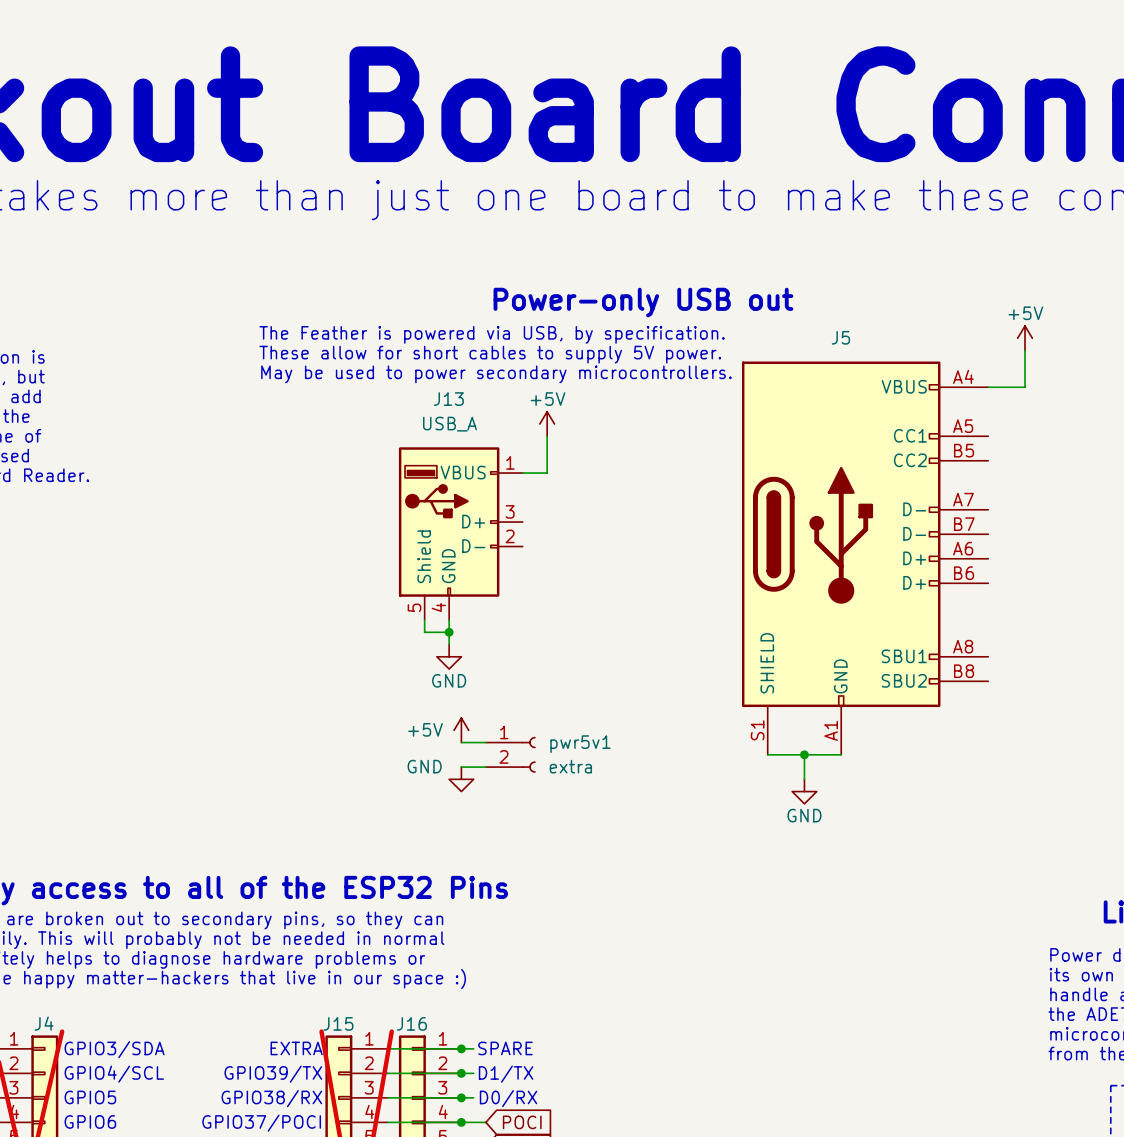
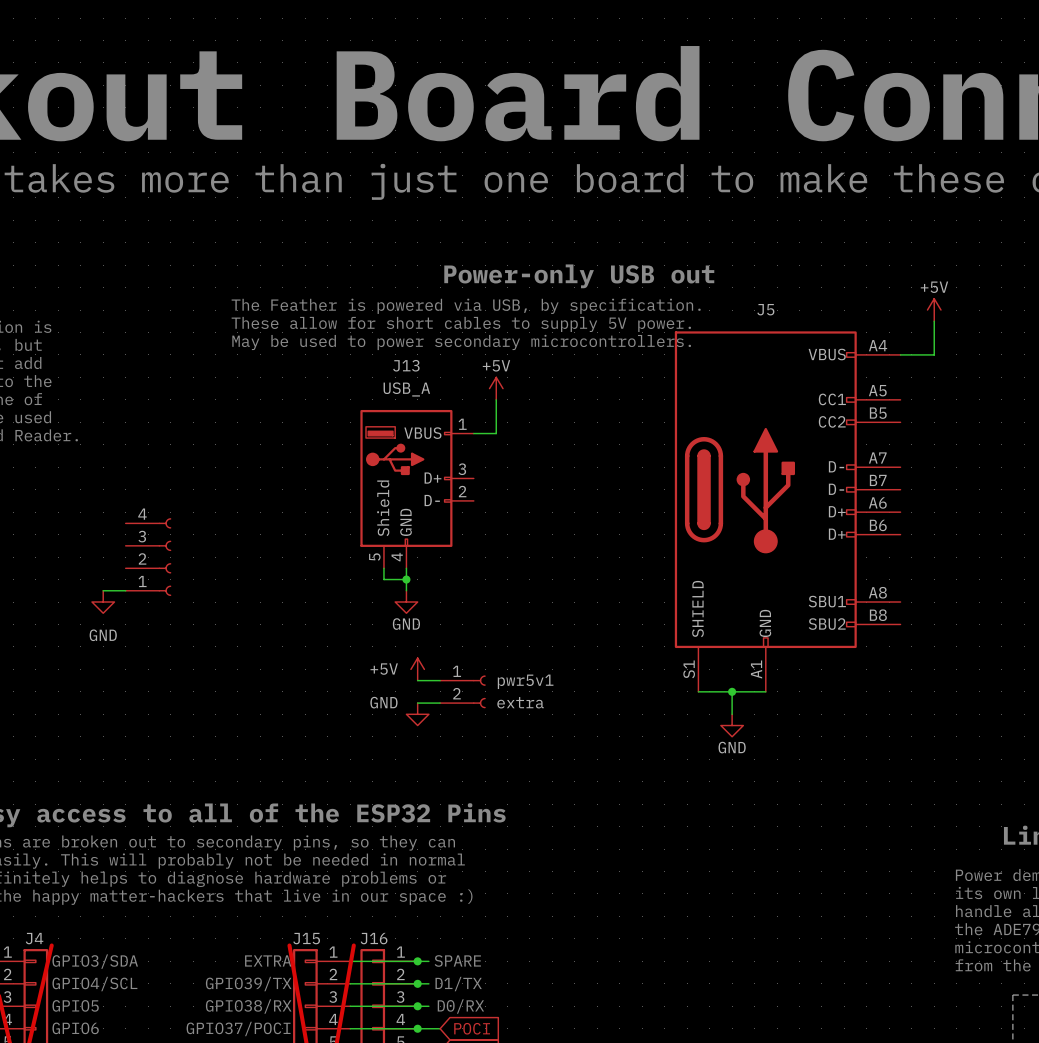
part: none -> (148, 557)
wire: none -> (103, 590) (125, 590)
power symbol: none -> GND (103, 602)

